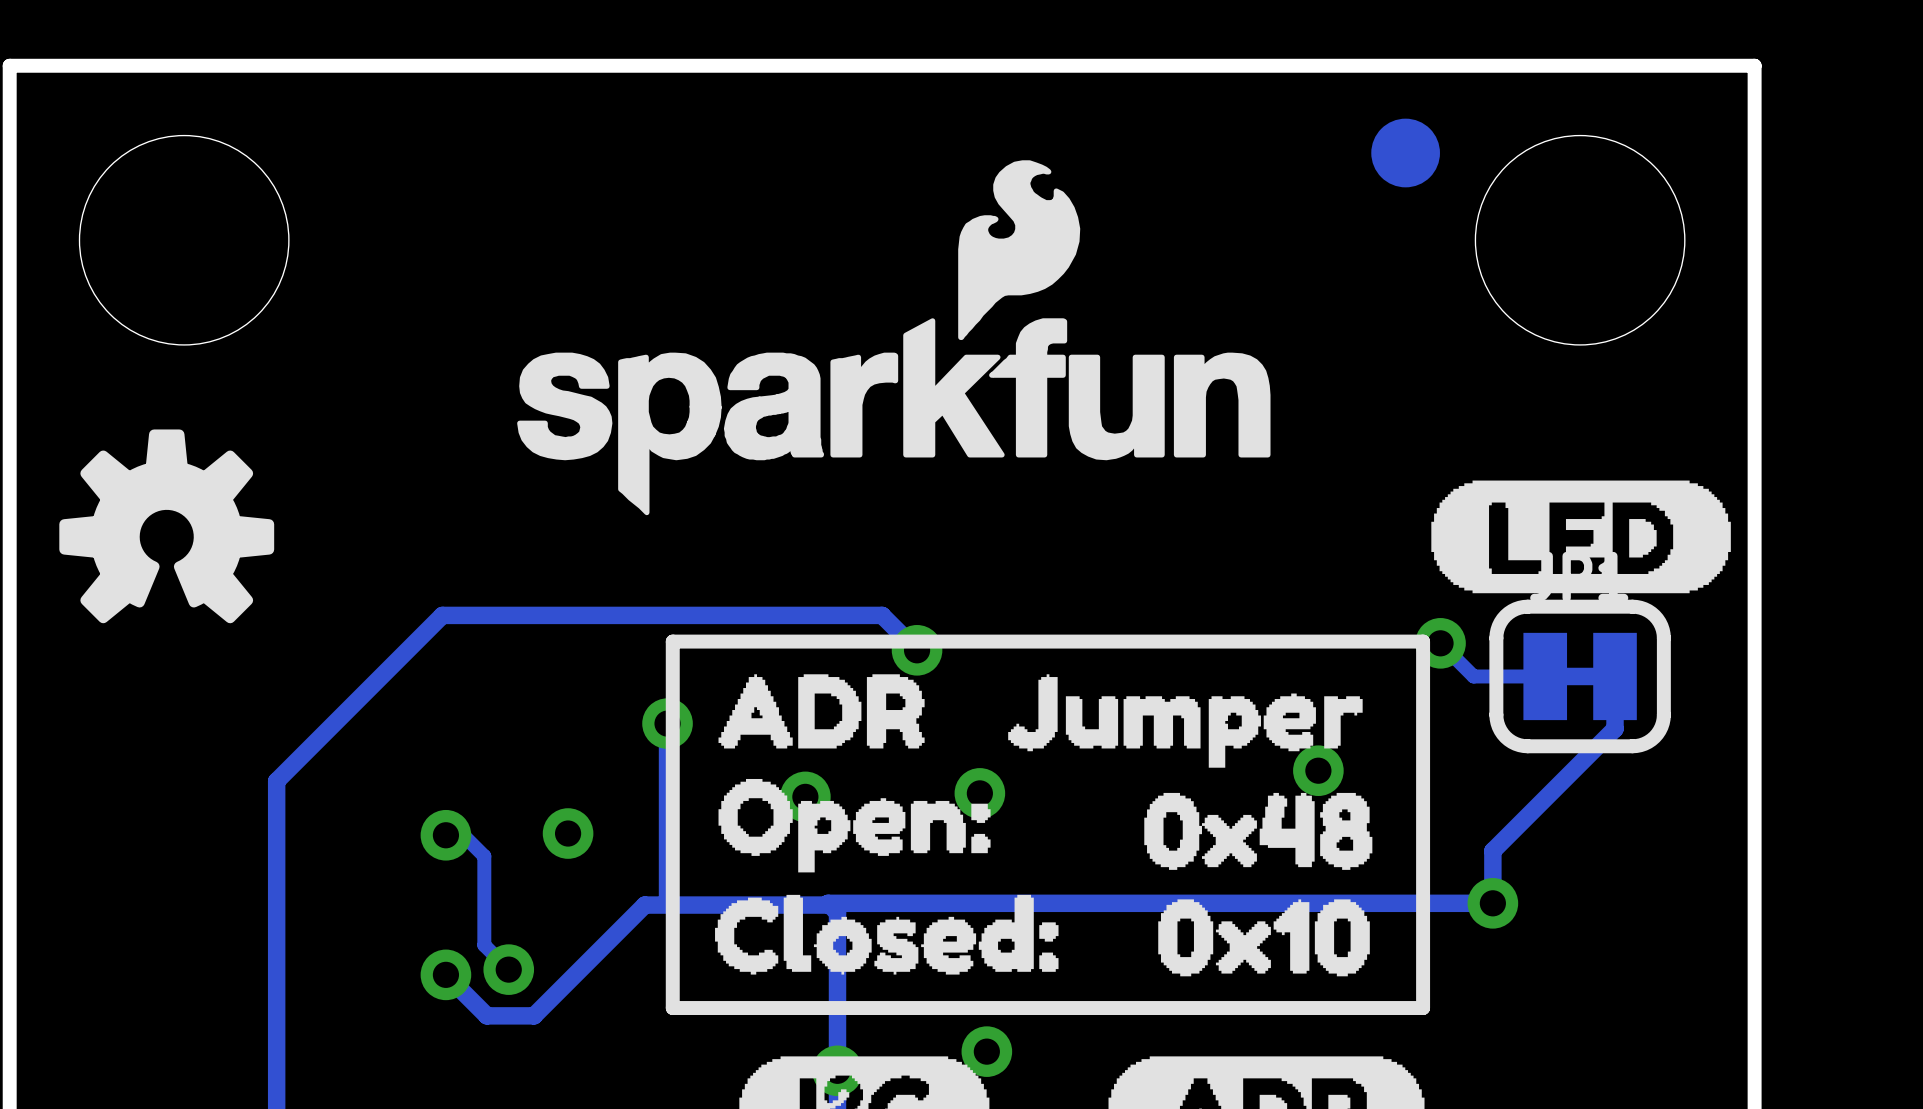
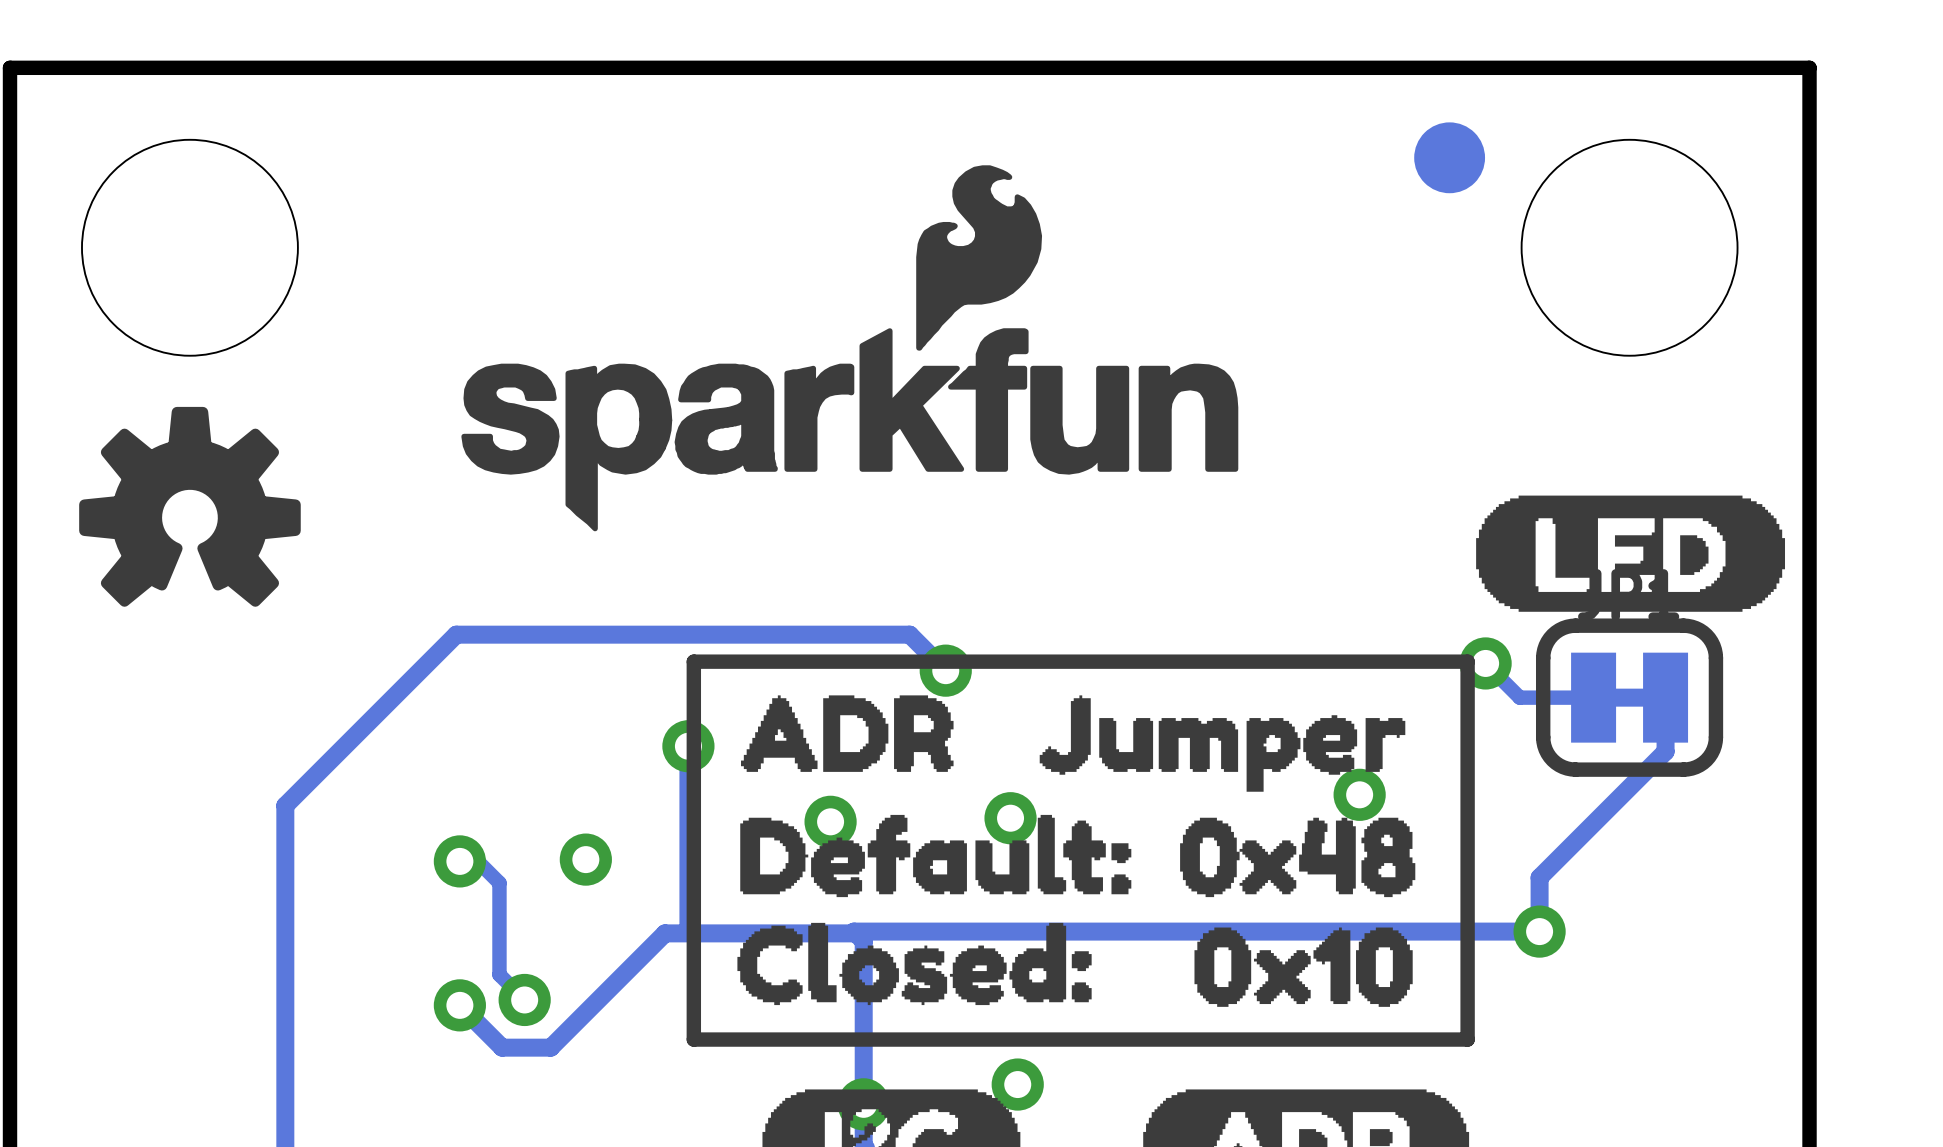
drawing position: (893, 337) -> (849, 348)
drawing position: (166, 526) -> (189, 506)
drawing shape: [718, 778, 991, 873] -> [740, 814, 1132, 898]

